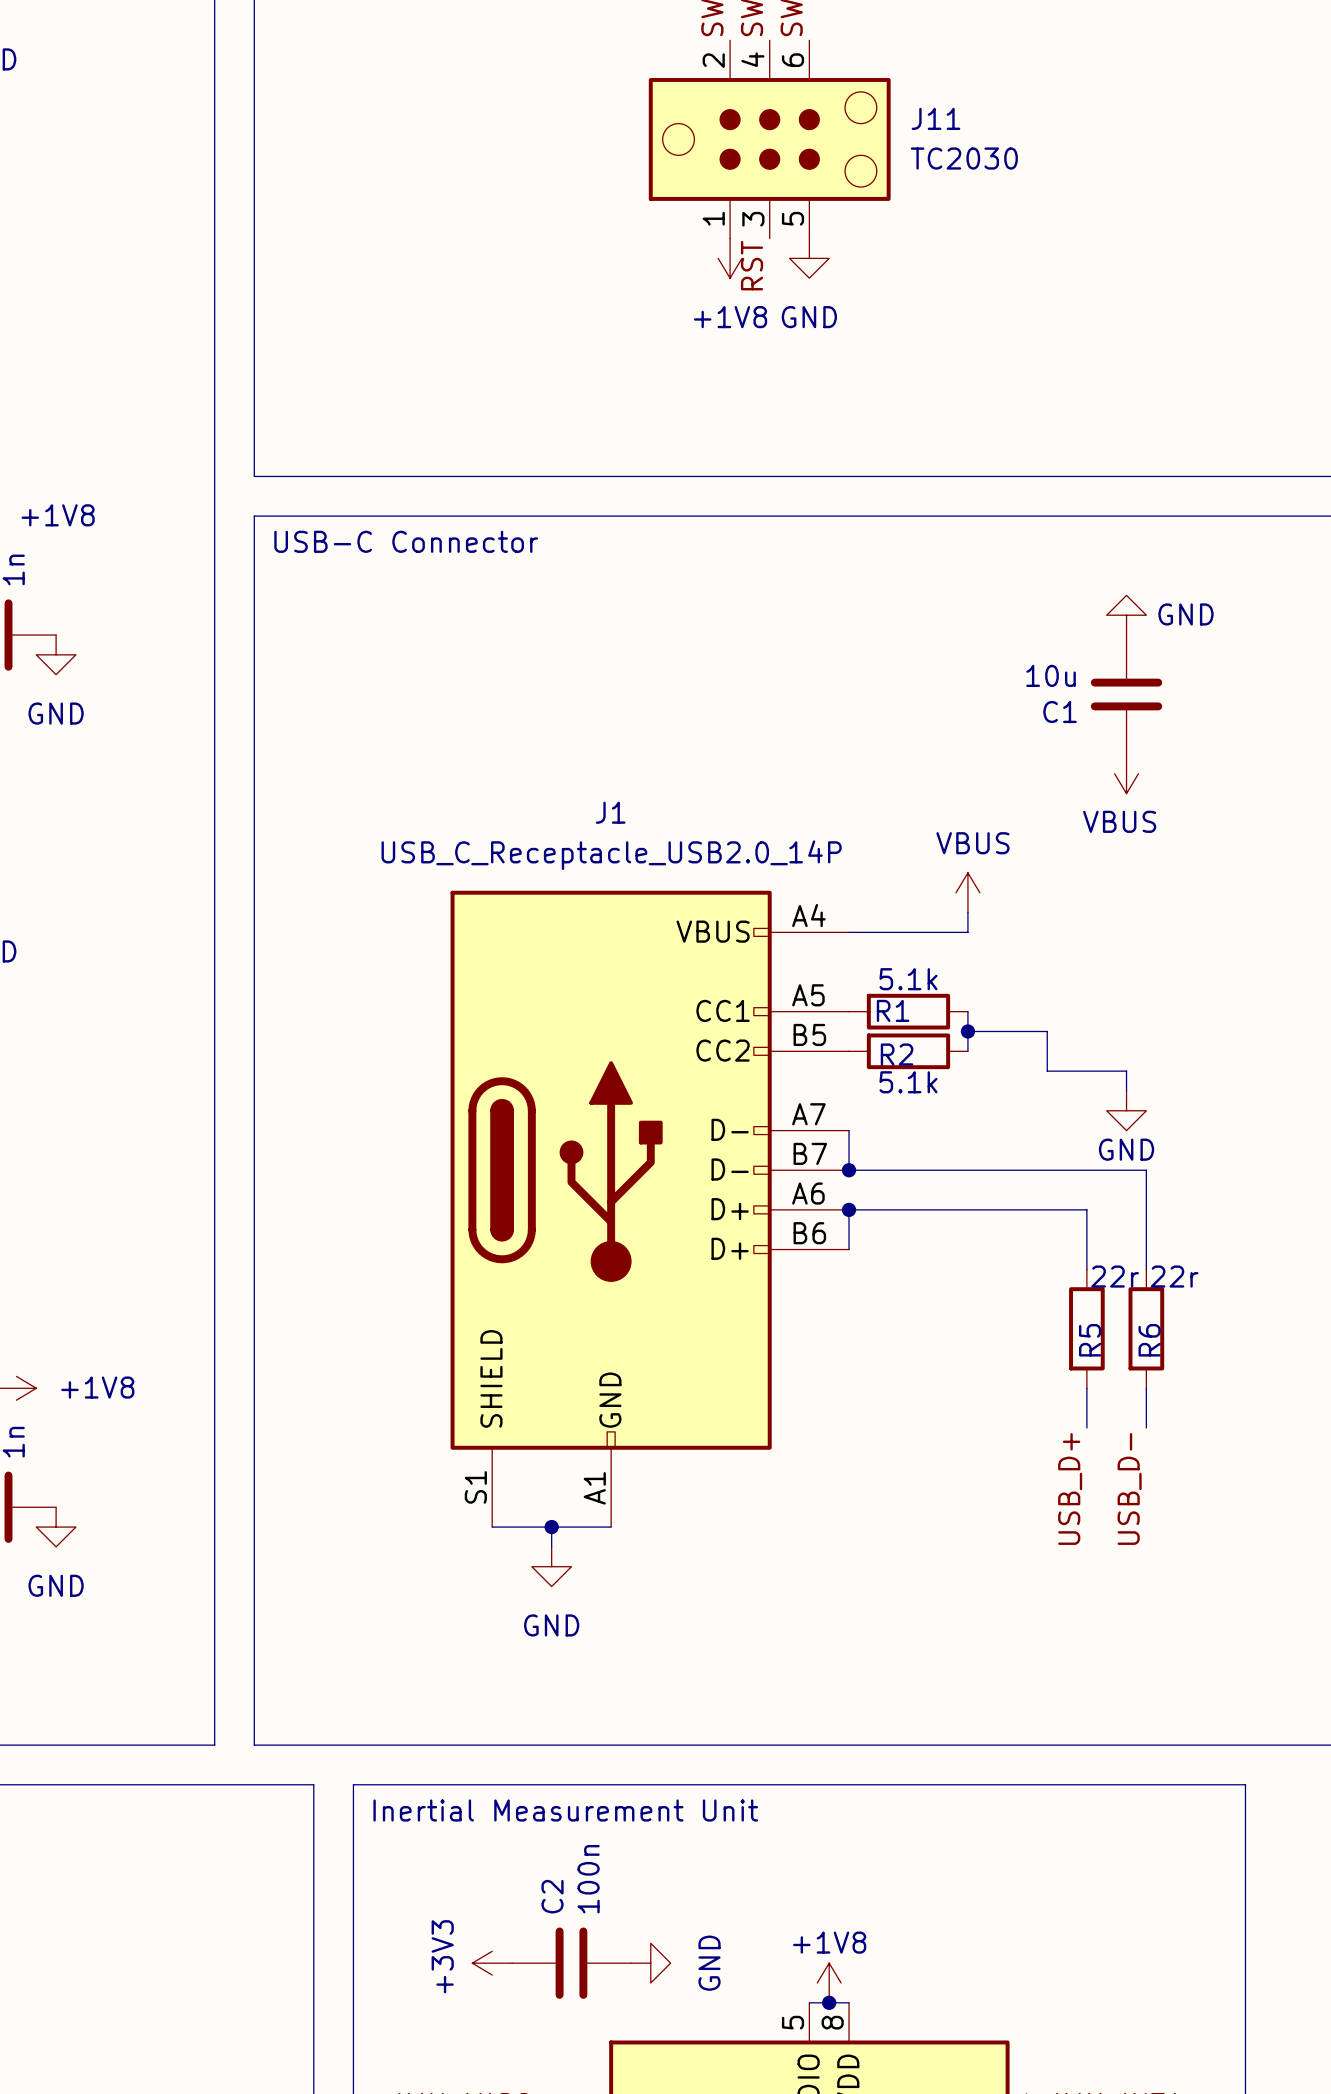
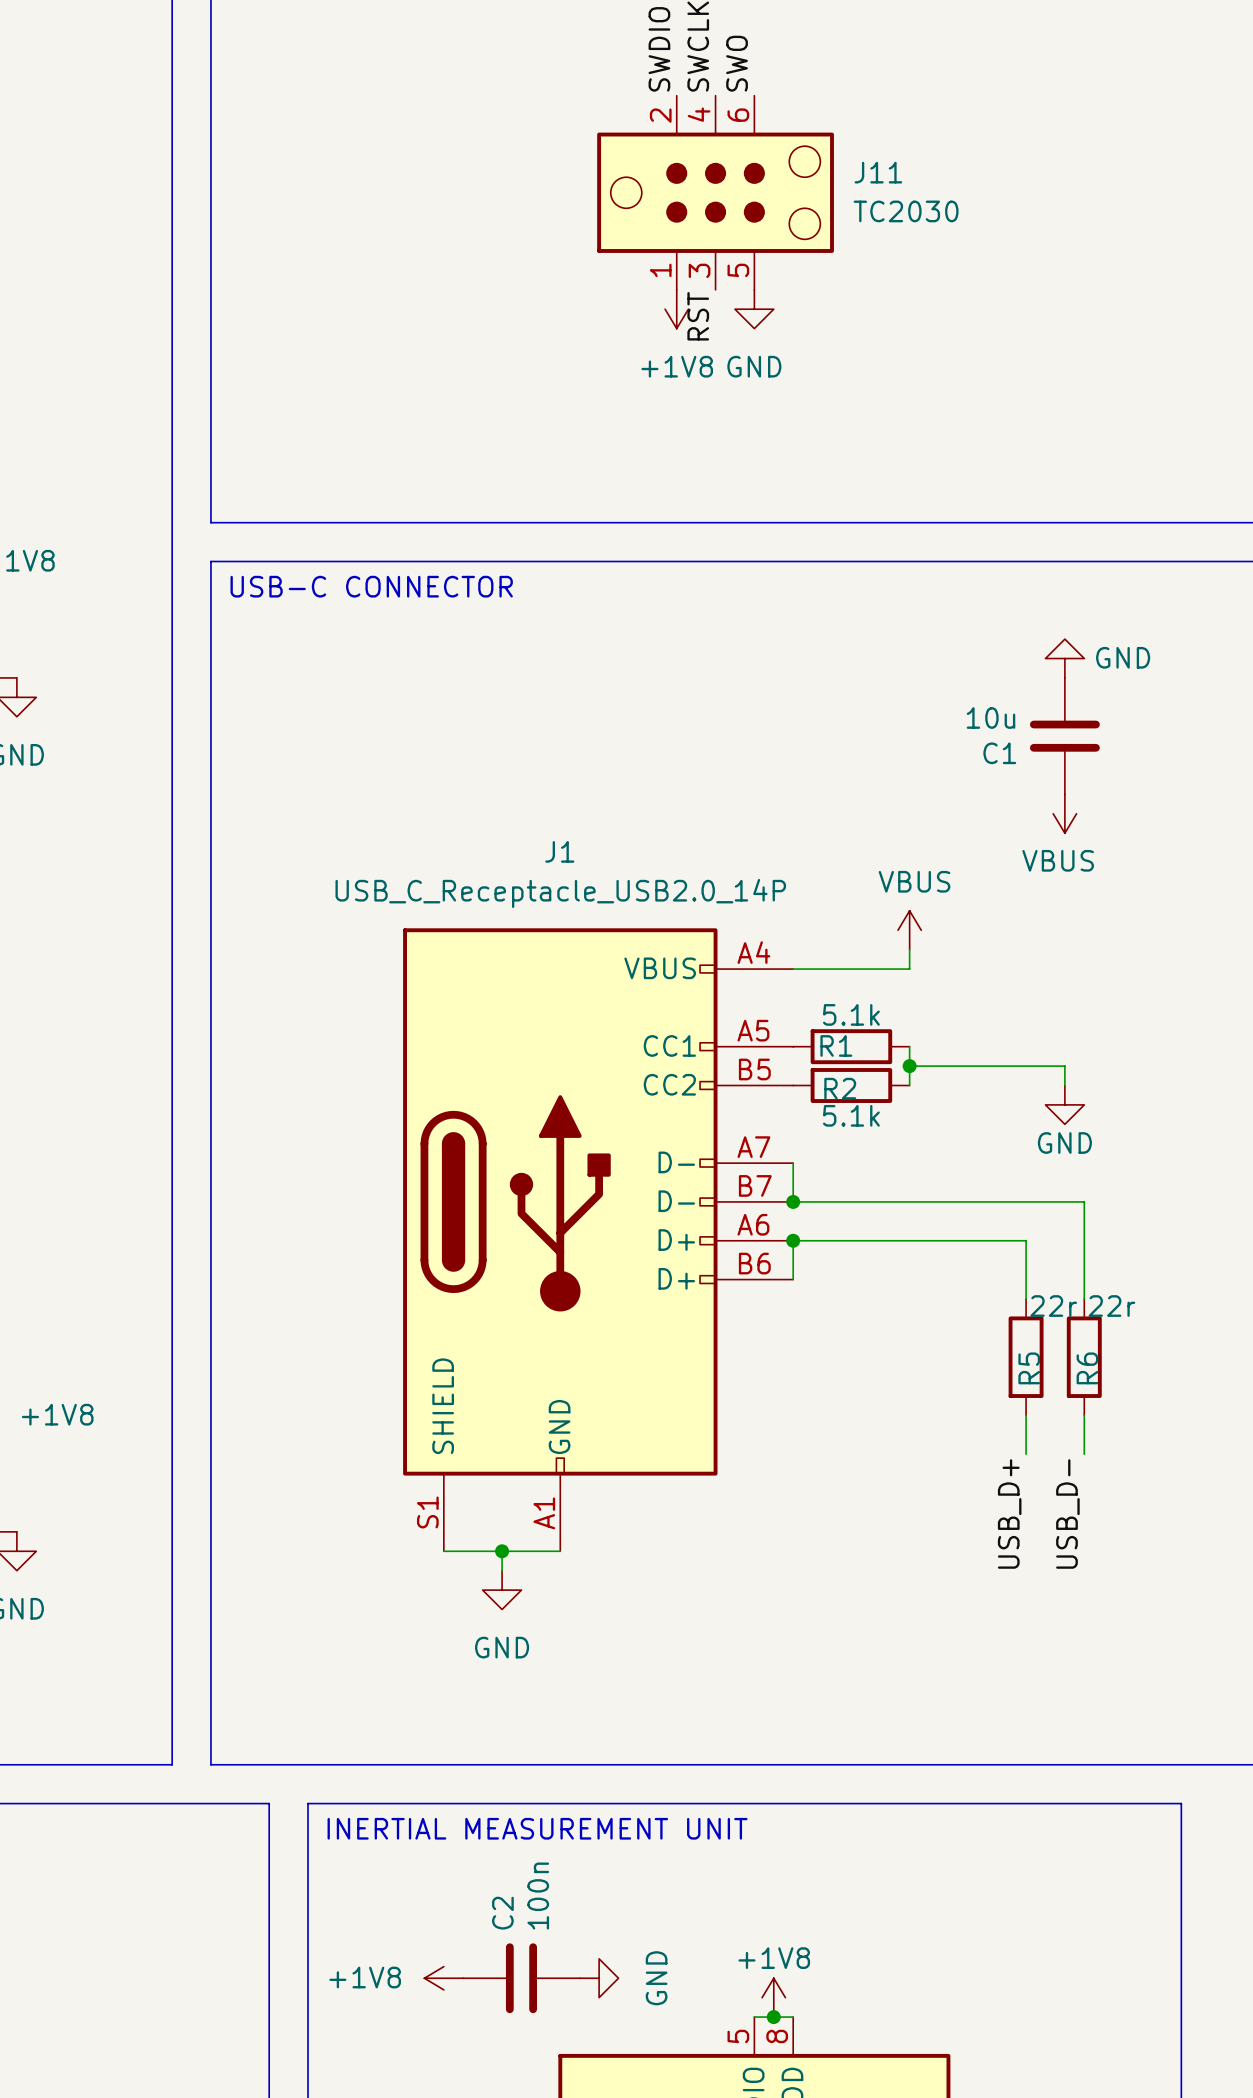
text: USB-C Connector (406, 541) -> USB-C CONNECTOR (371, 586)
wire: (1047, 1031) (1047, 1071) (1126, 1071) (1126, 1090) -> (987, 1066) (1064, 1066) (1064, 1085)
power symbol position: GND (1126, 1110) -> GND (1064, 1104)
text: Inertial Measurement Unit (565, 1810) -> INERTIAL MEASUREMENT UNIT (537, 1828)
power symbol: +3V3 (492, 1963) -> +1V8 (443, 1978)

